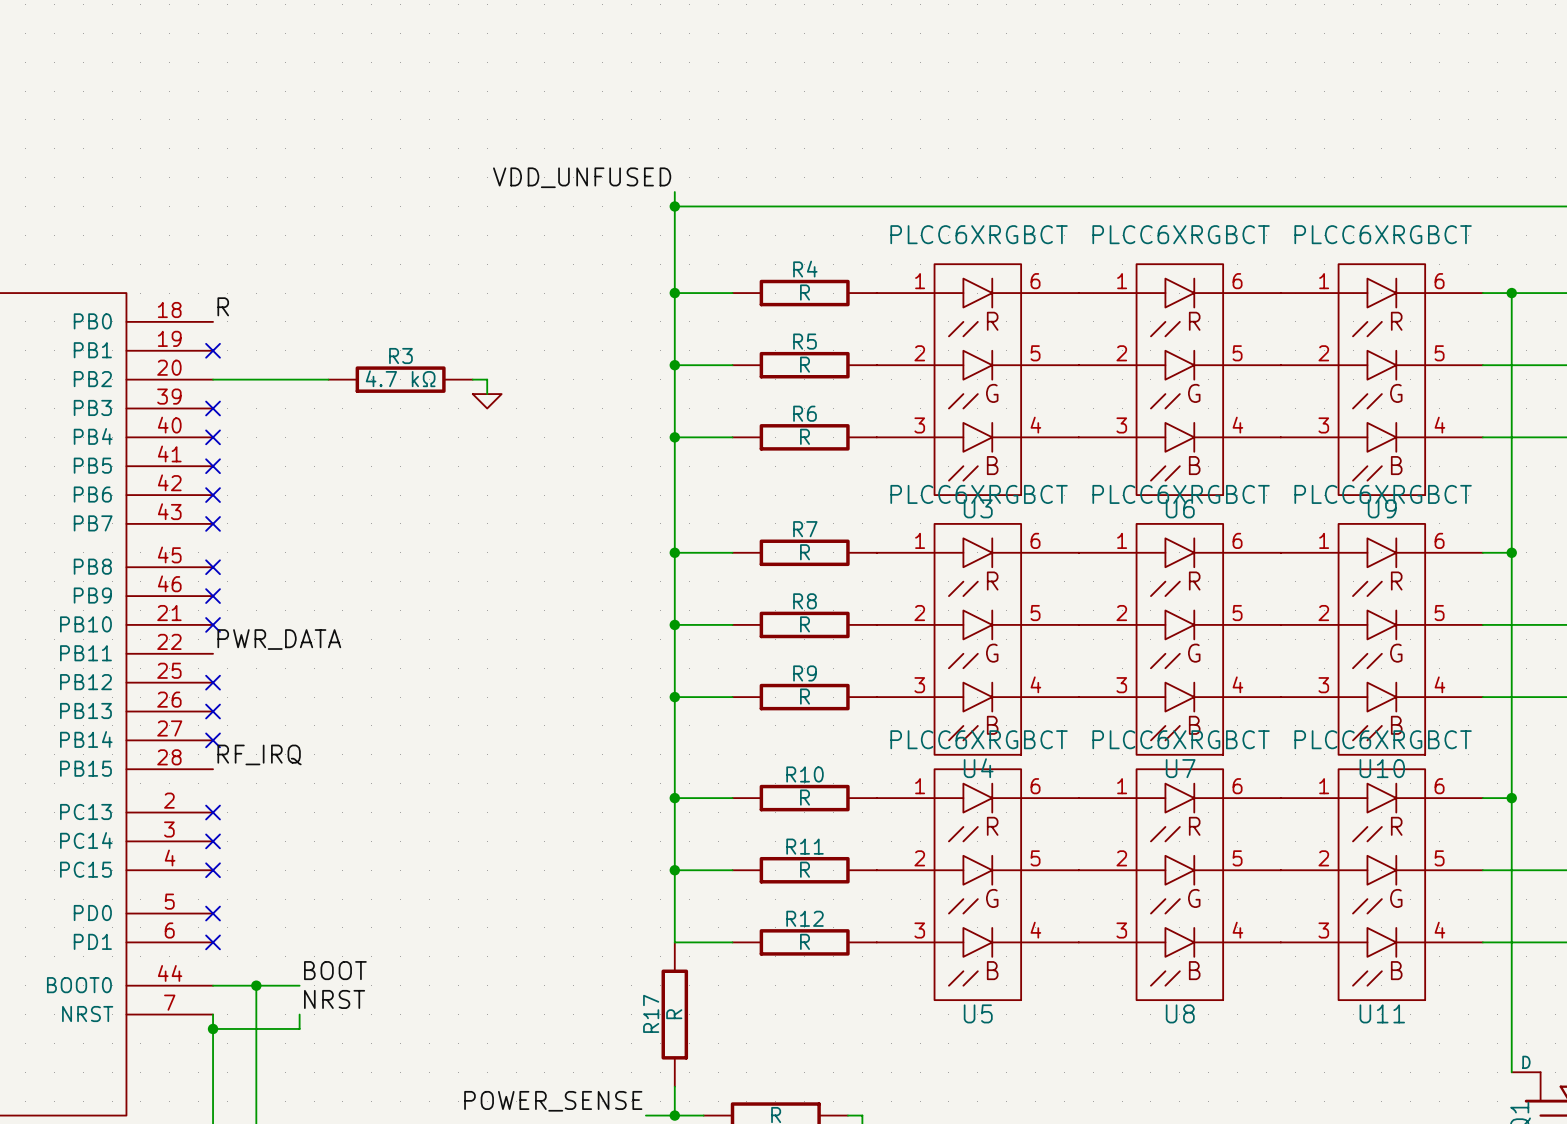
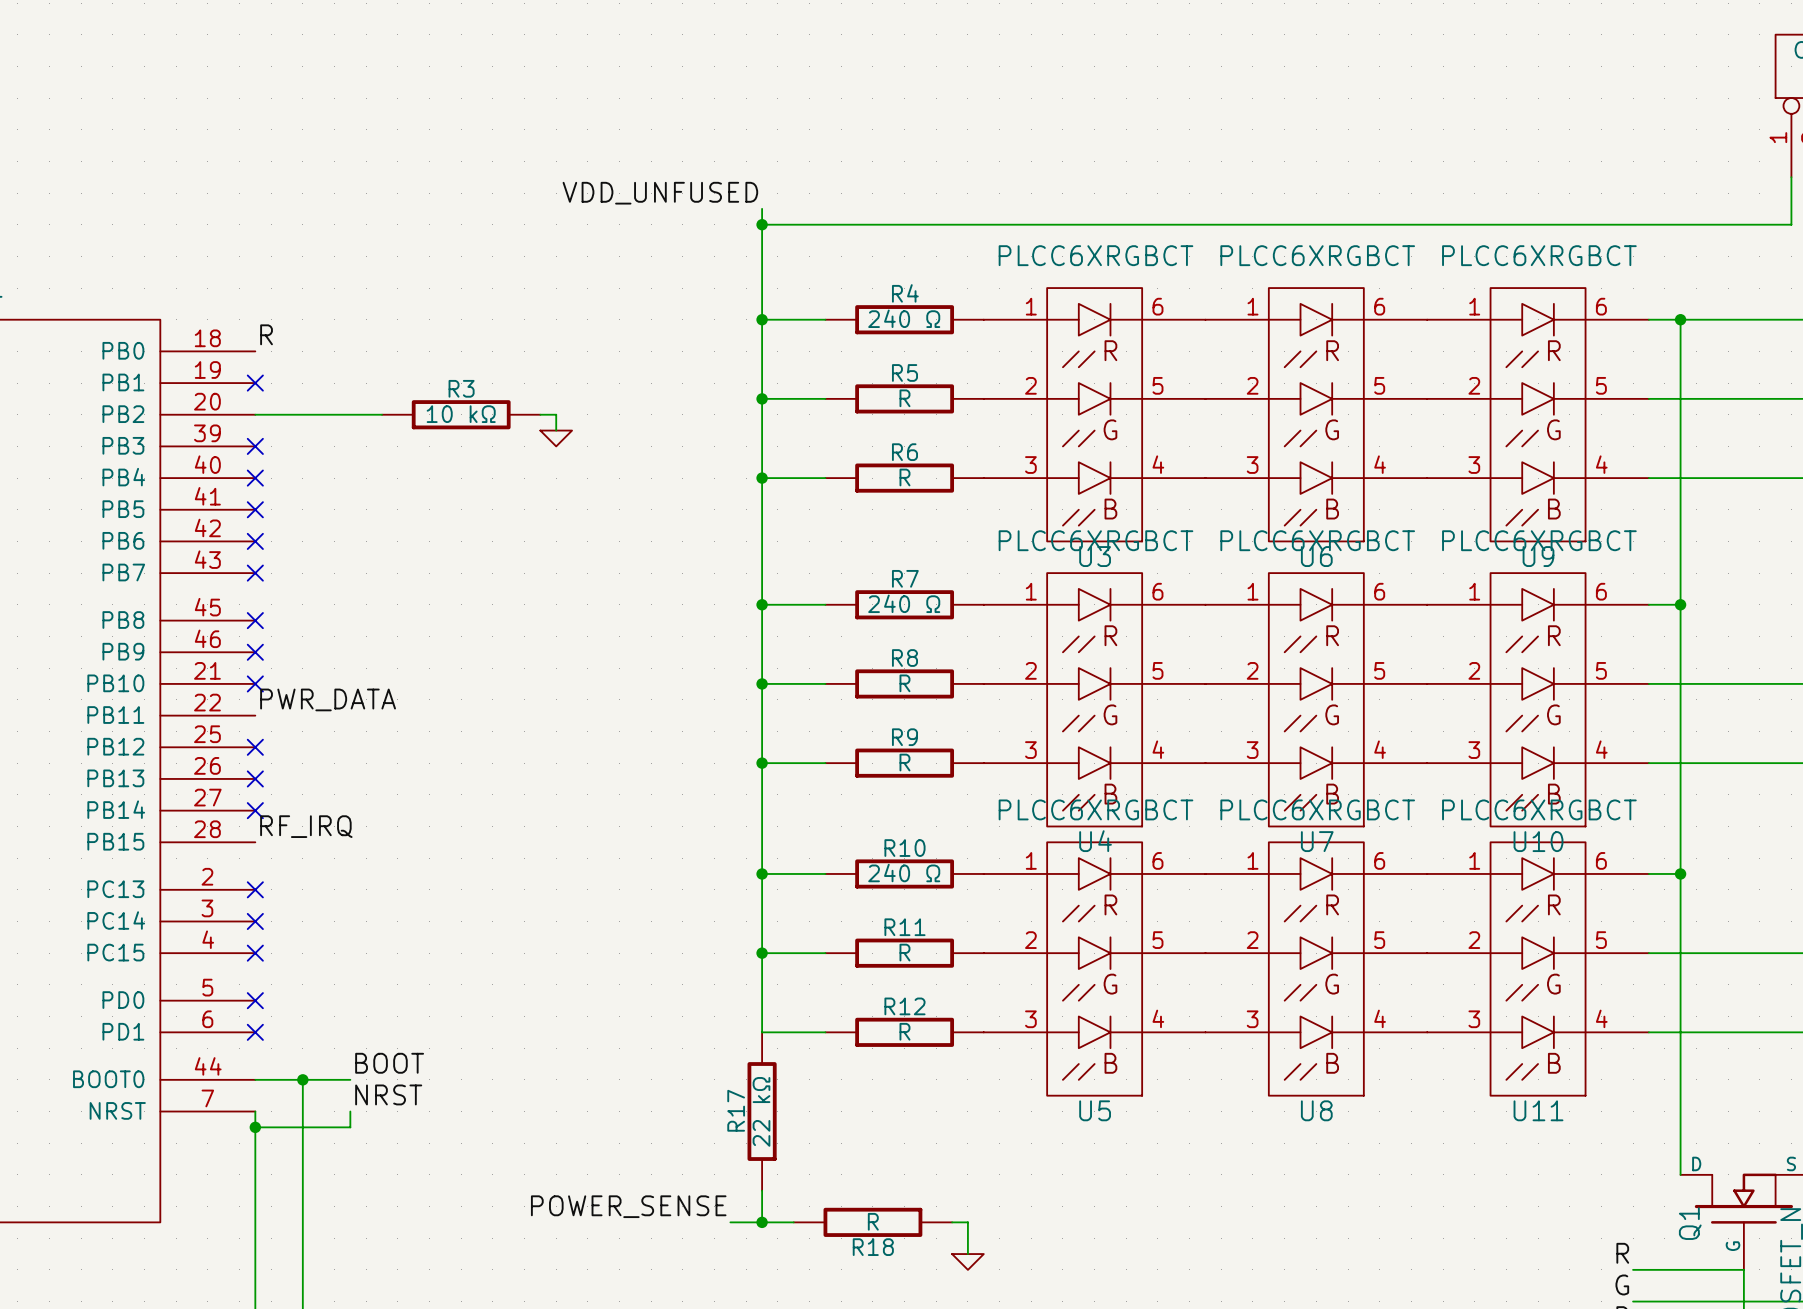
R4 value: R (805, 292) -> 240 Ω (904, 318)
R3 value: 4.7 kΩ (400, 378) -> 10 kΩ (461, 414)
R7 value: R (805, 552) -> 240 Ω (904, 603)
R10 value: R (805, 797) -> 240 Ω (904, 873)
R17 value: R (674, 1014) -> 22 kΩ (761, 1111)

